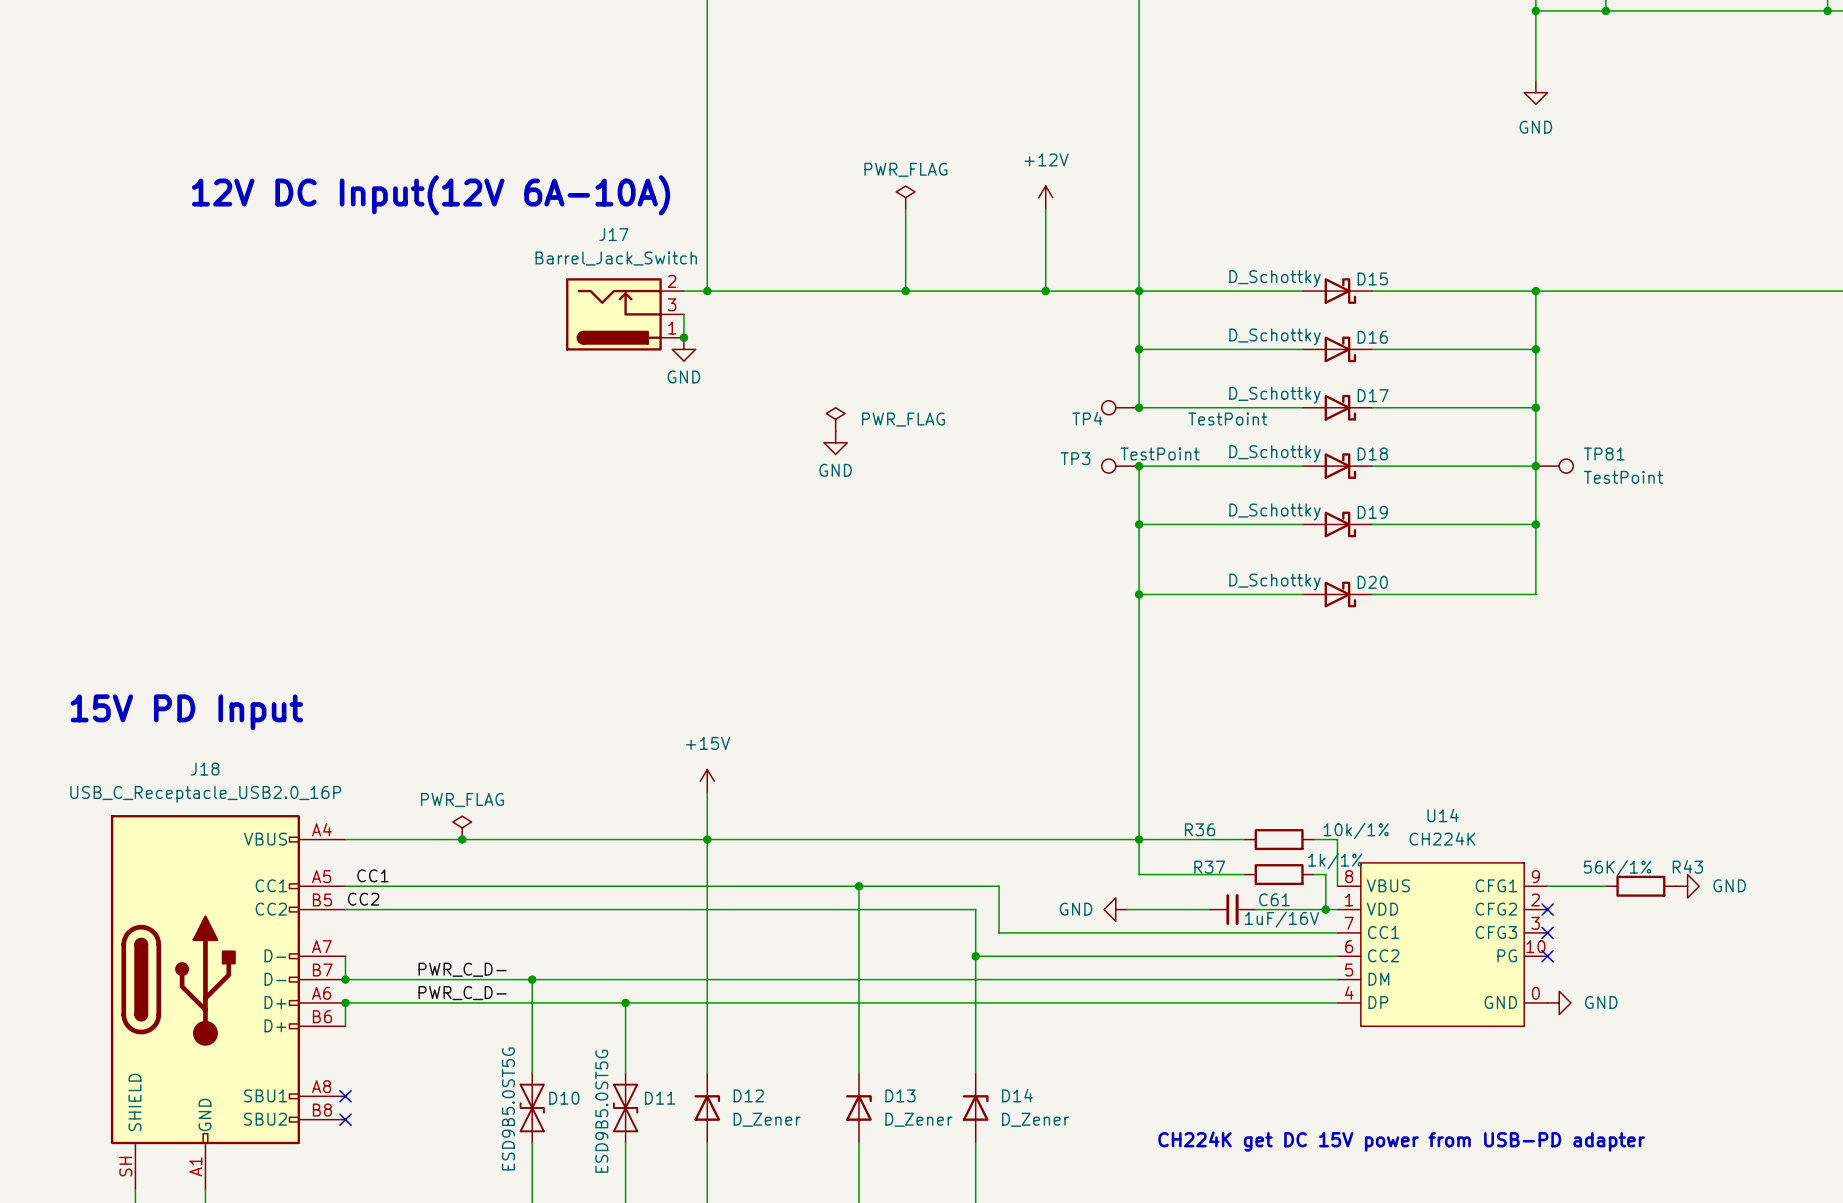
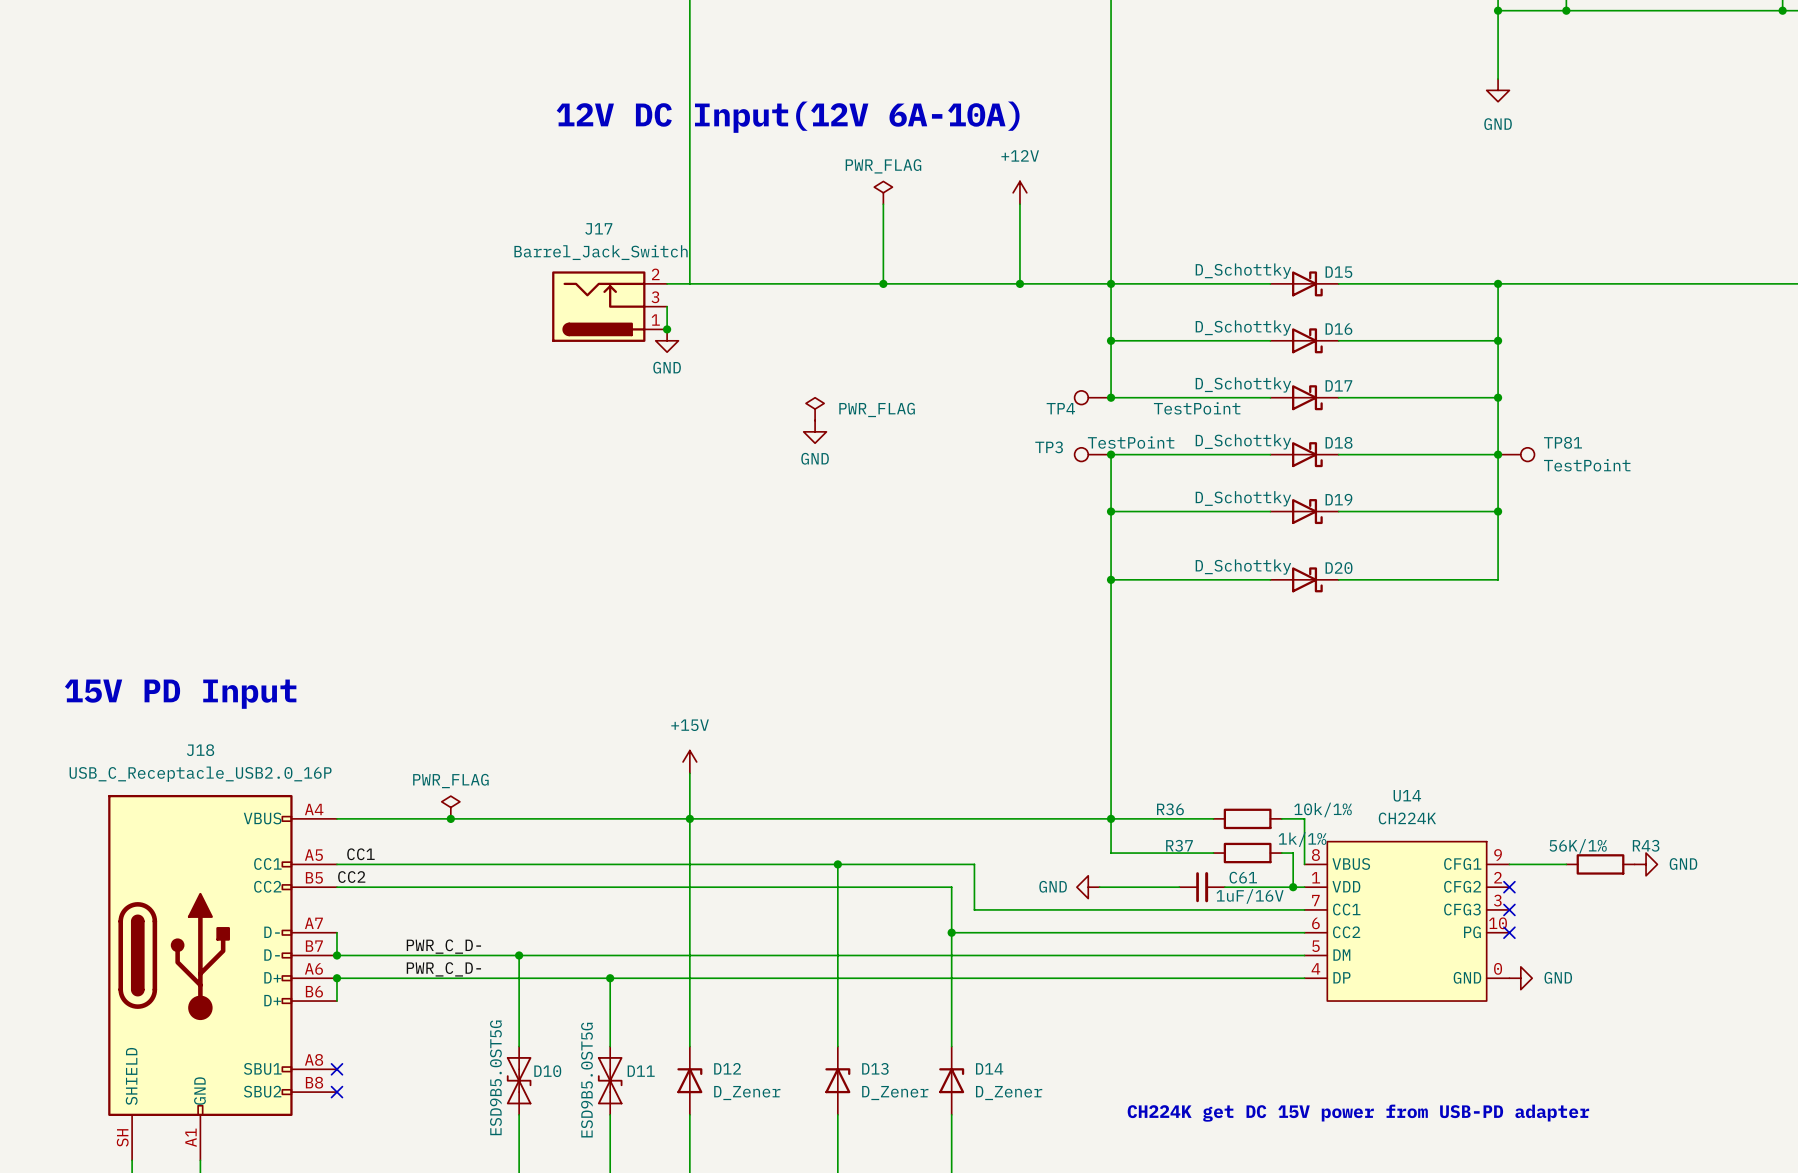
text: none -> 12V DC Input(12V 6A-10A) (788, 117)
text: 12V DC Input(12V 6A-10A) (431, 195) -> none
junction: (707, 291) -> none

